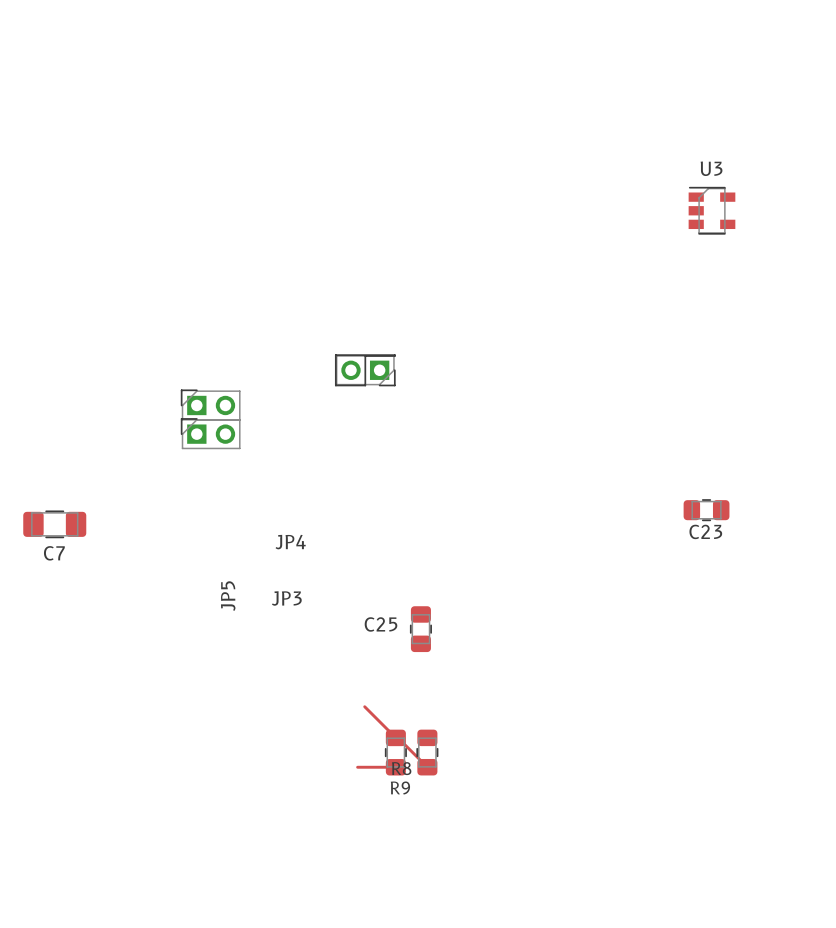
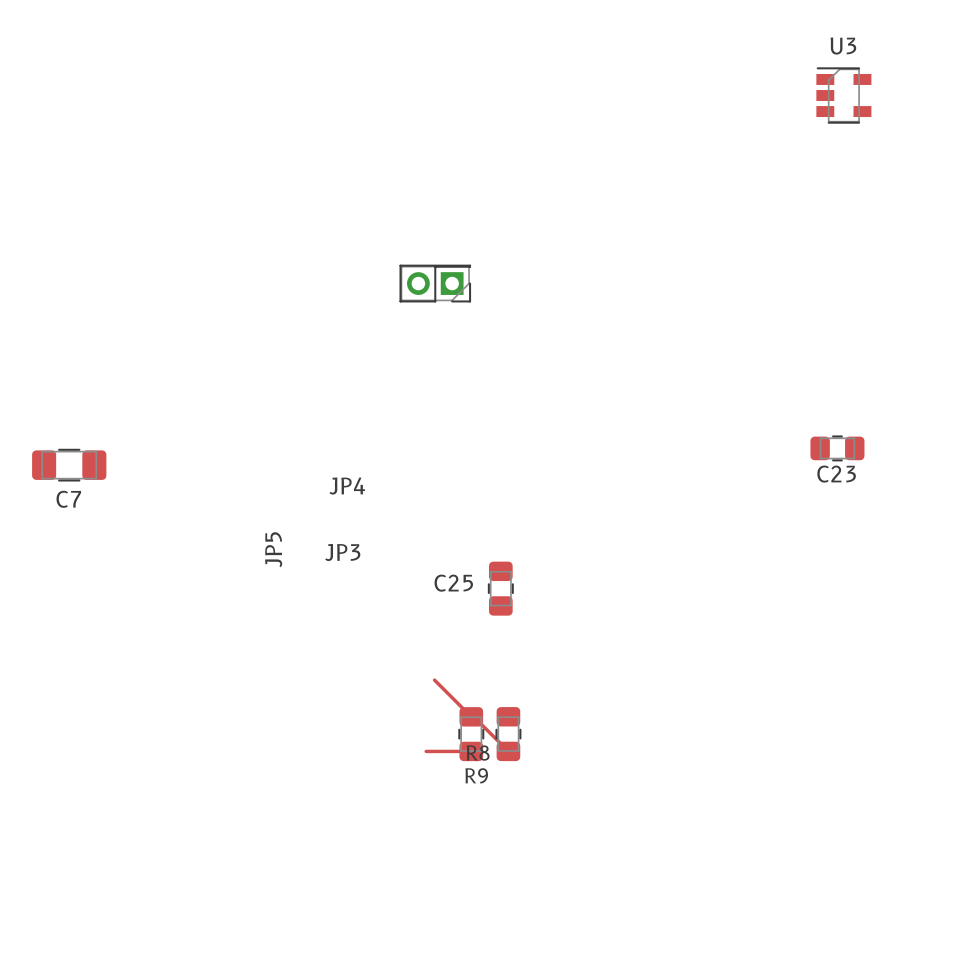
part: (210, 404) -> none
part: (210, 433) -> none

